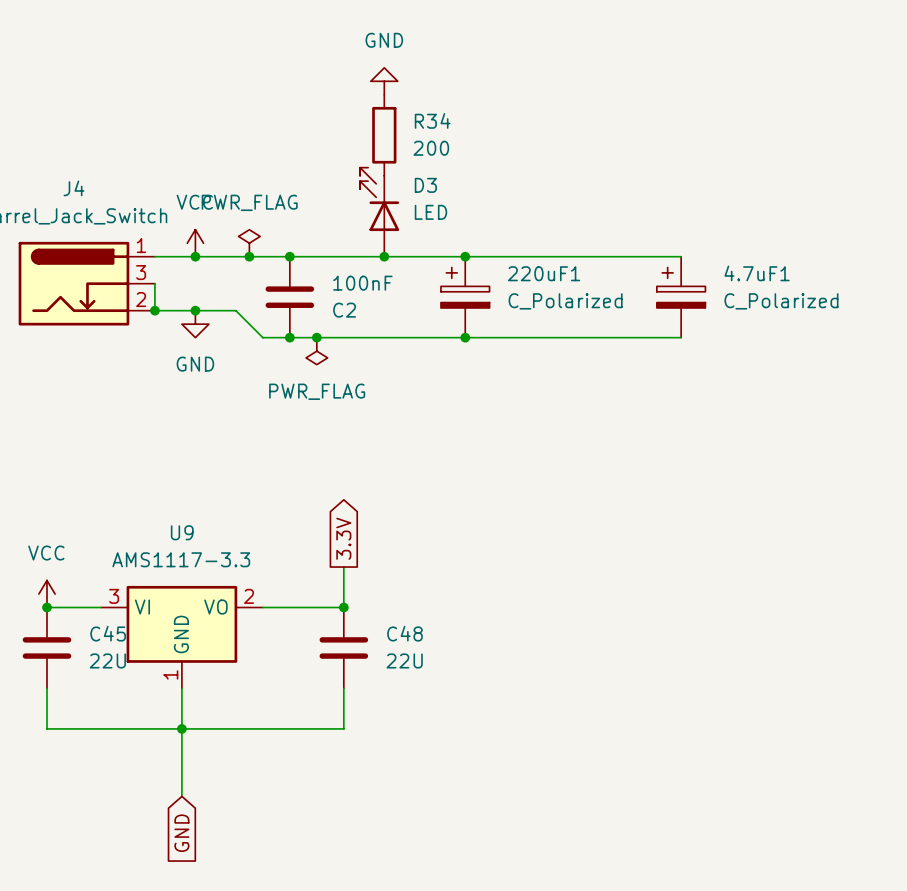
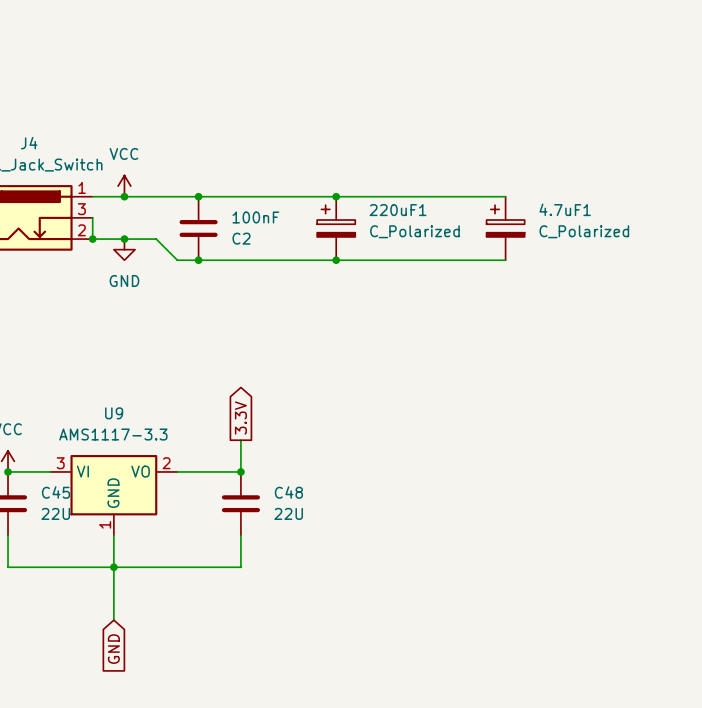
power symbol: GND (384, 81) -> none
R34: 200 (384, 135) -> none
D3: LED (379, 212) -> none
power symbol: PWR_FLAG (249, 243) -> none
junction: (249, 256) -> none
junction: (384, 256) -> none
junction: (316, 337) -> none
power symbol: PWR_FLAG (316, 351) -> none

